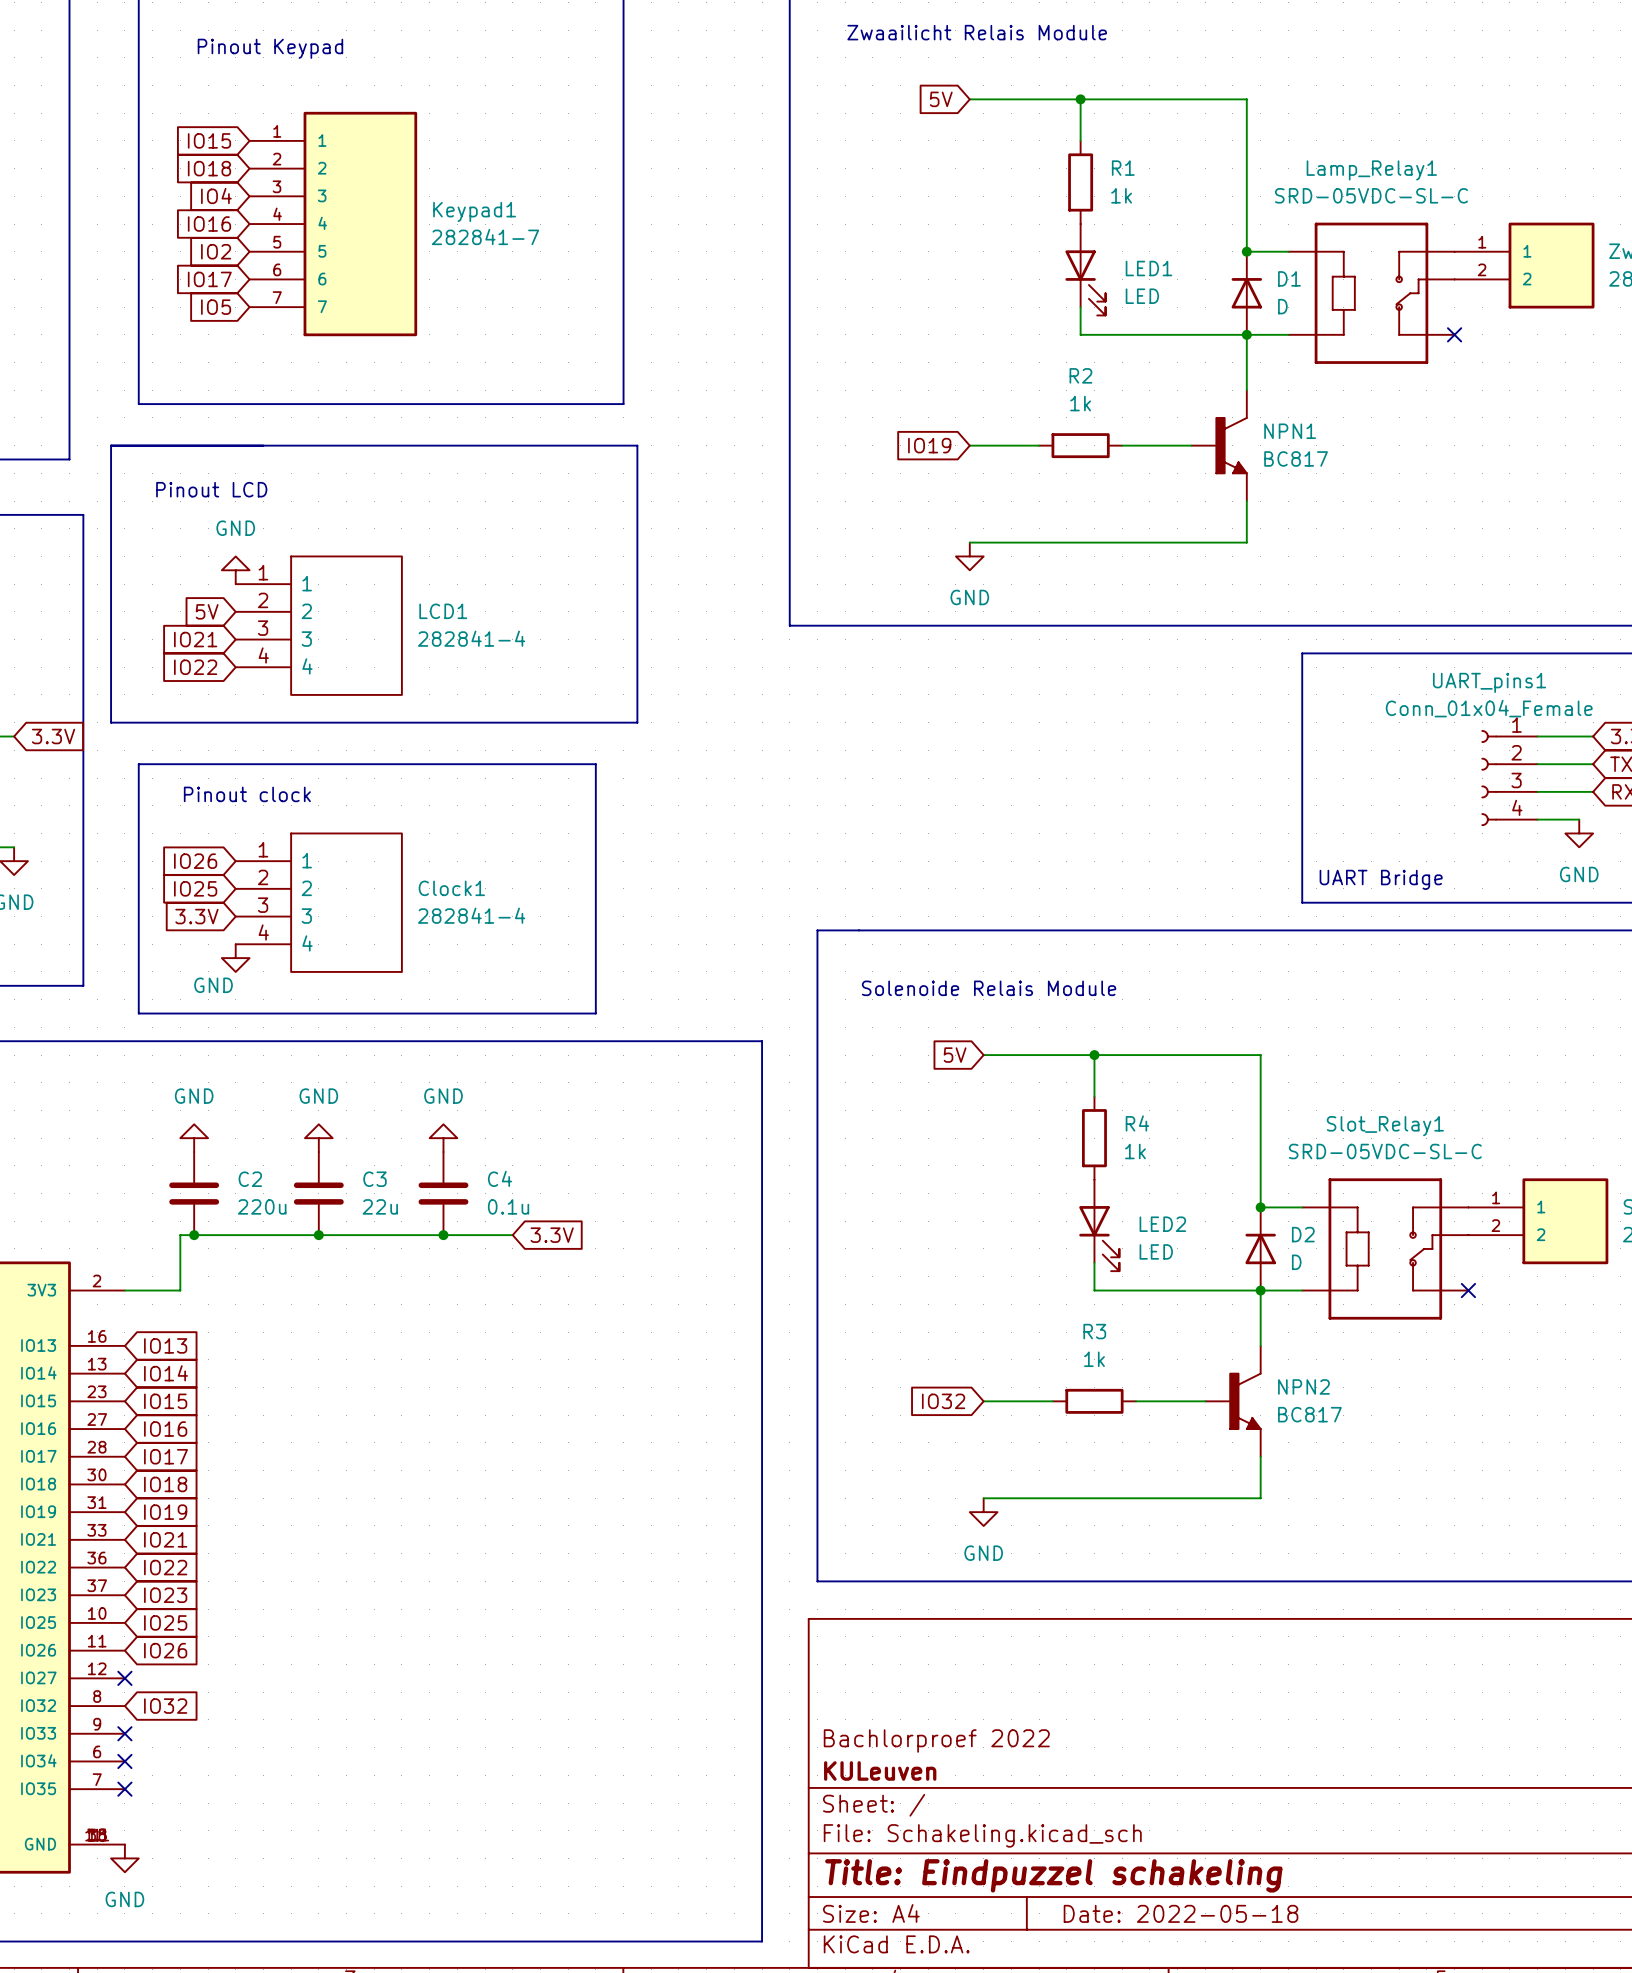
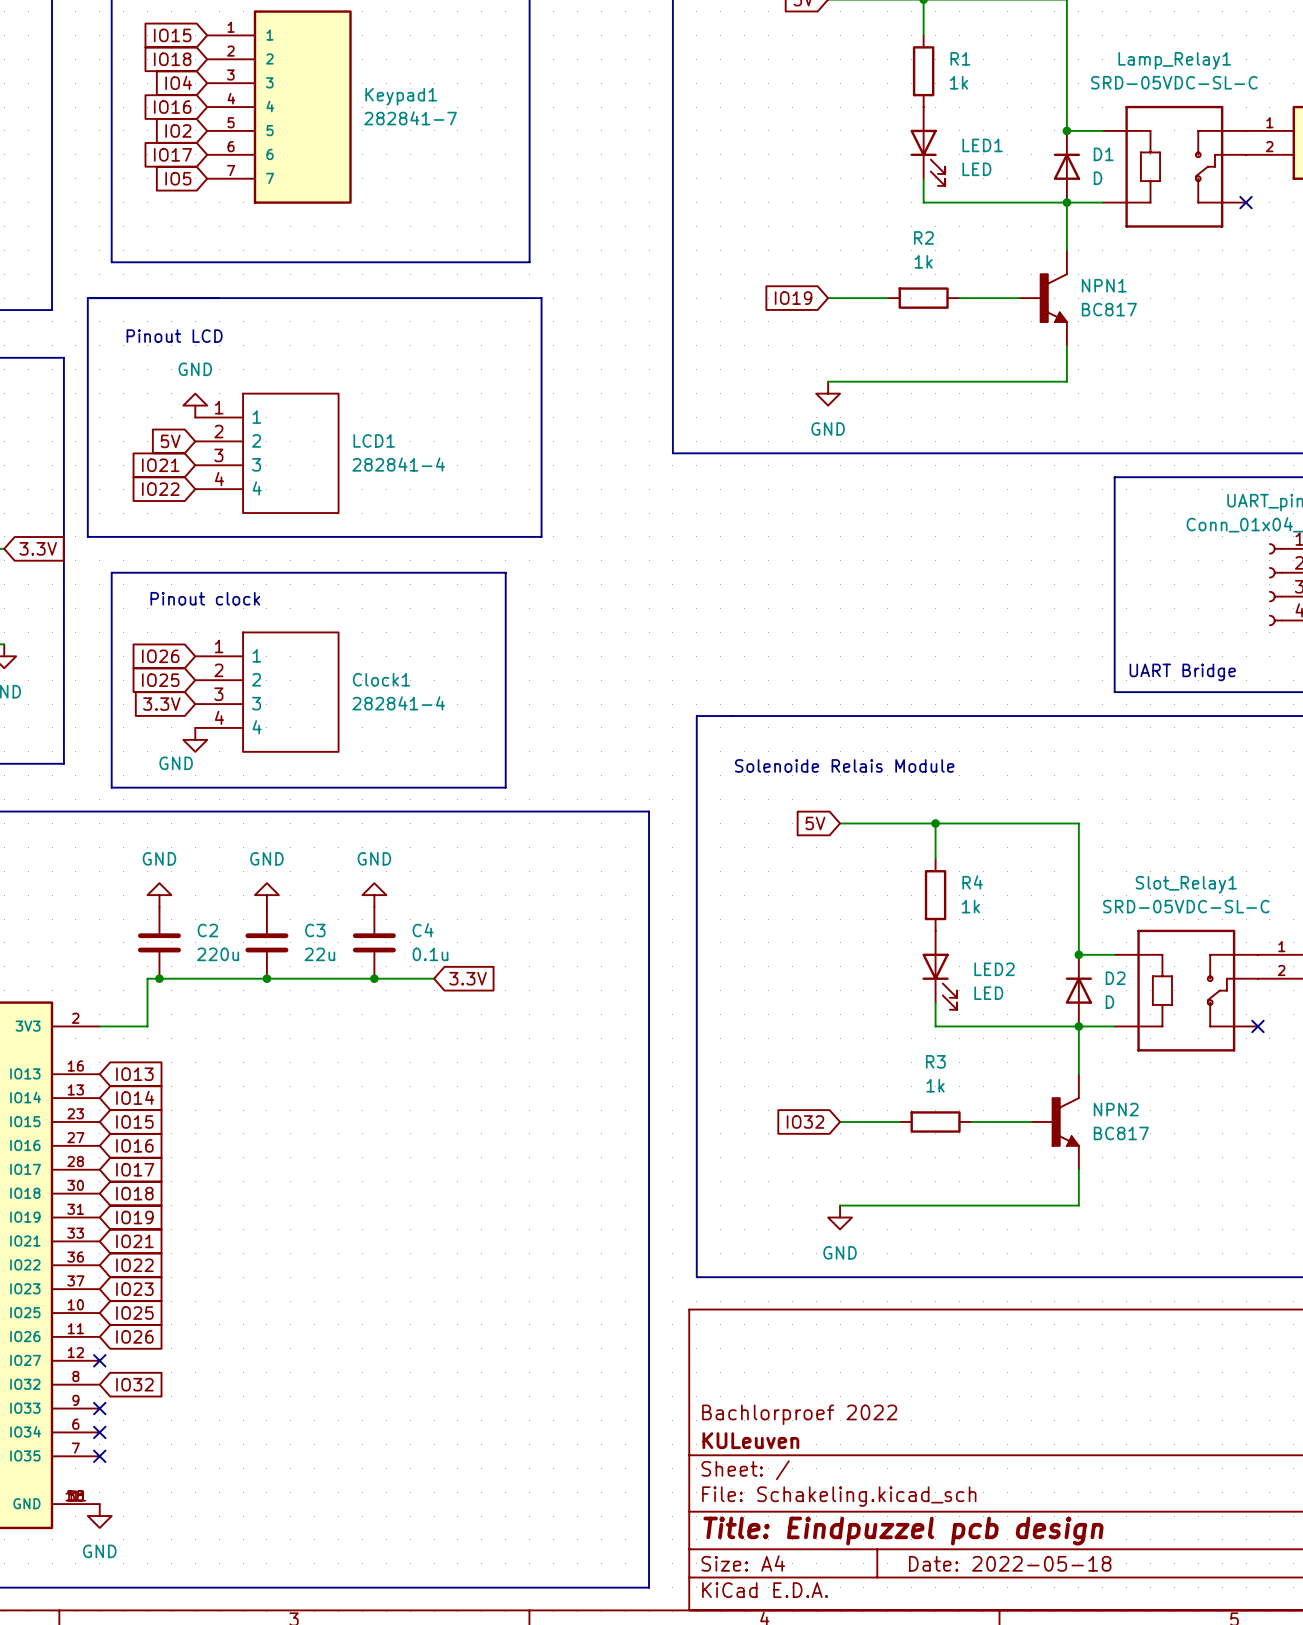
title block: Title: Eindpuzzel schakeling (1053, 1875) -> Title: Eindpuzzel pcb design (903, 1531)

